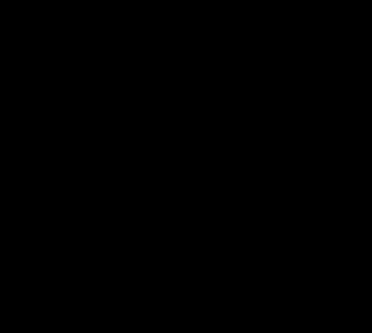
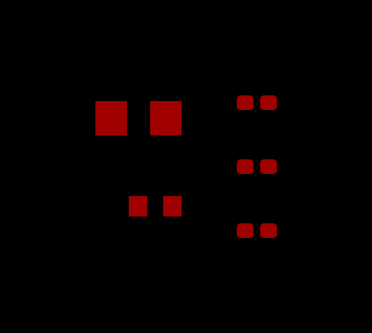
part: none -> (256, 102)
part: none -> (138, 118)
part: none -> (256, 166)
part: none -> (155, 206)
part: none -> (256, 230)

